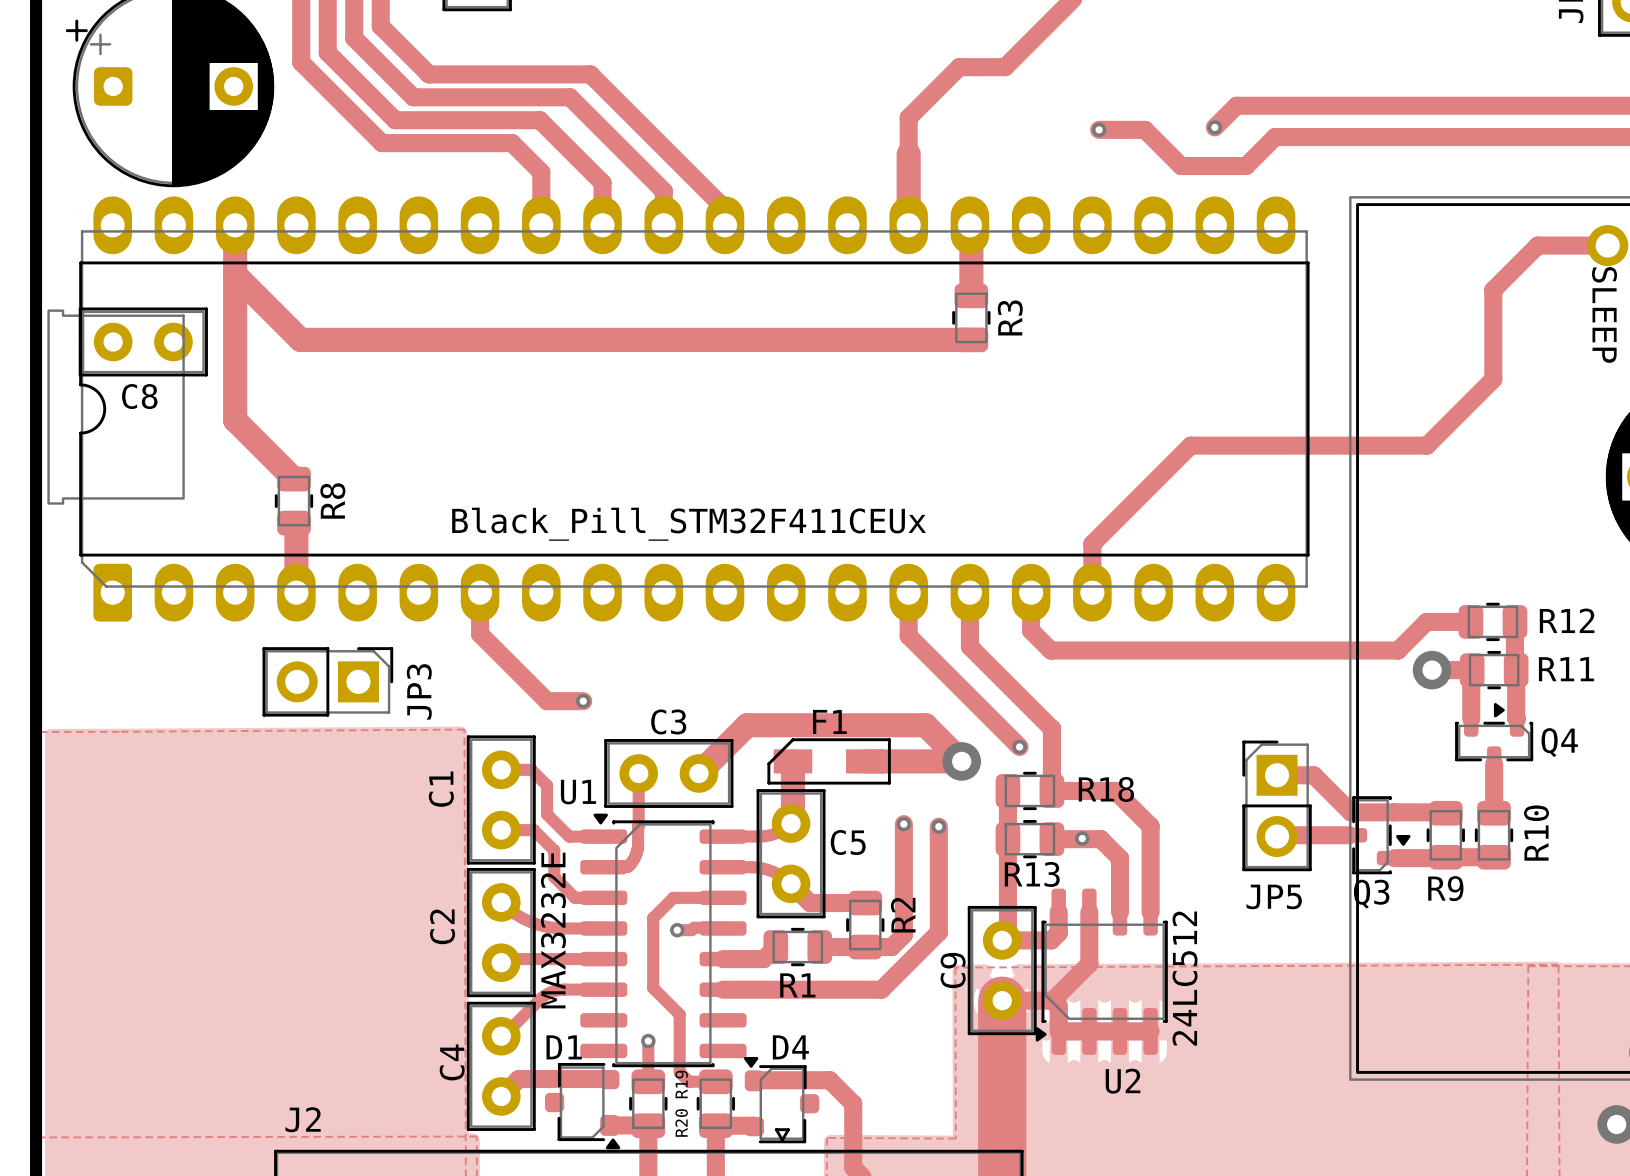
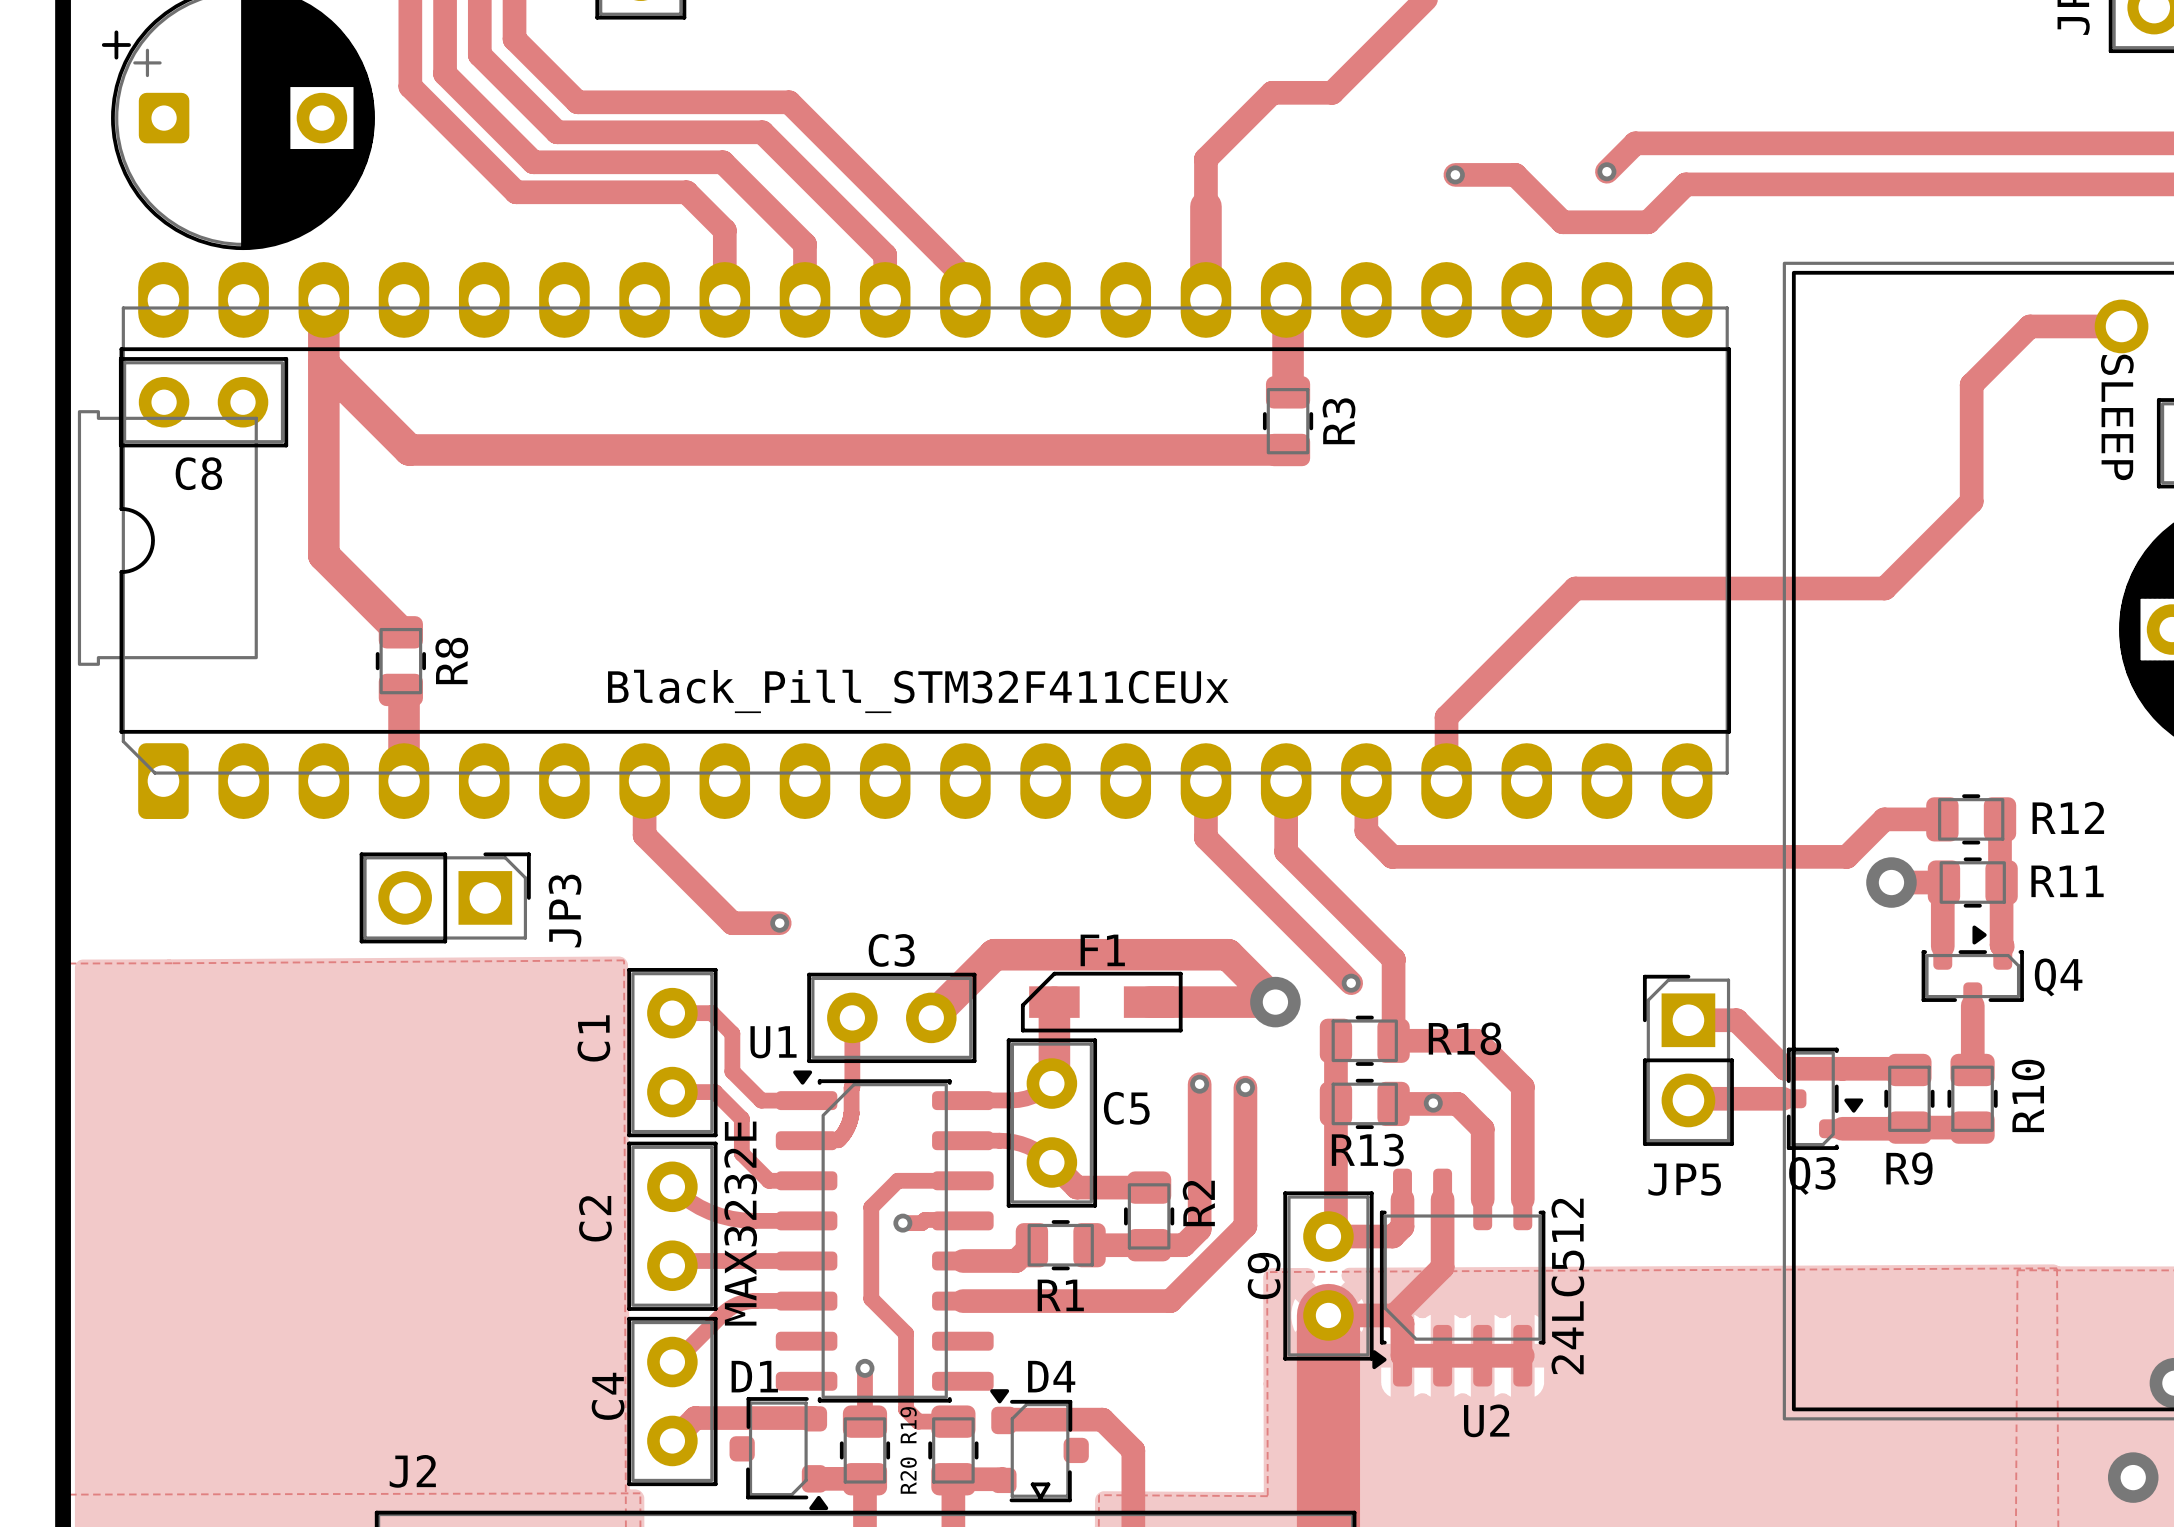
C8 position: (143, 341) -> (203, 402)

